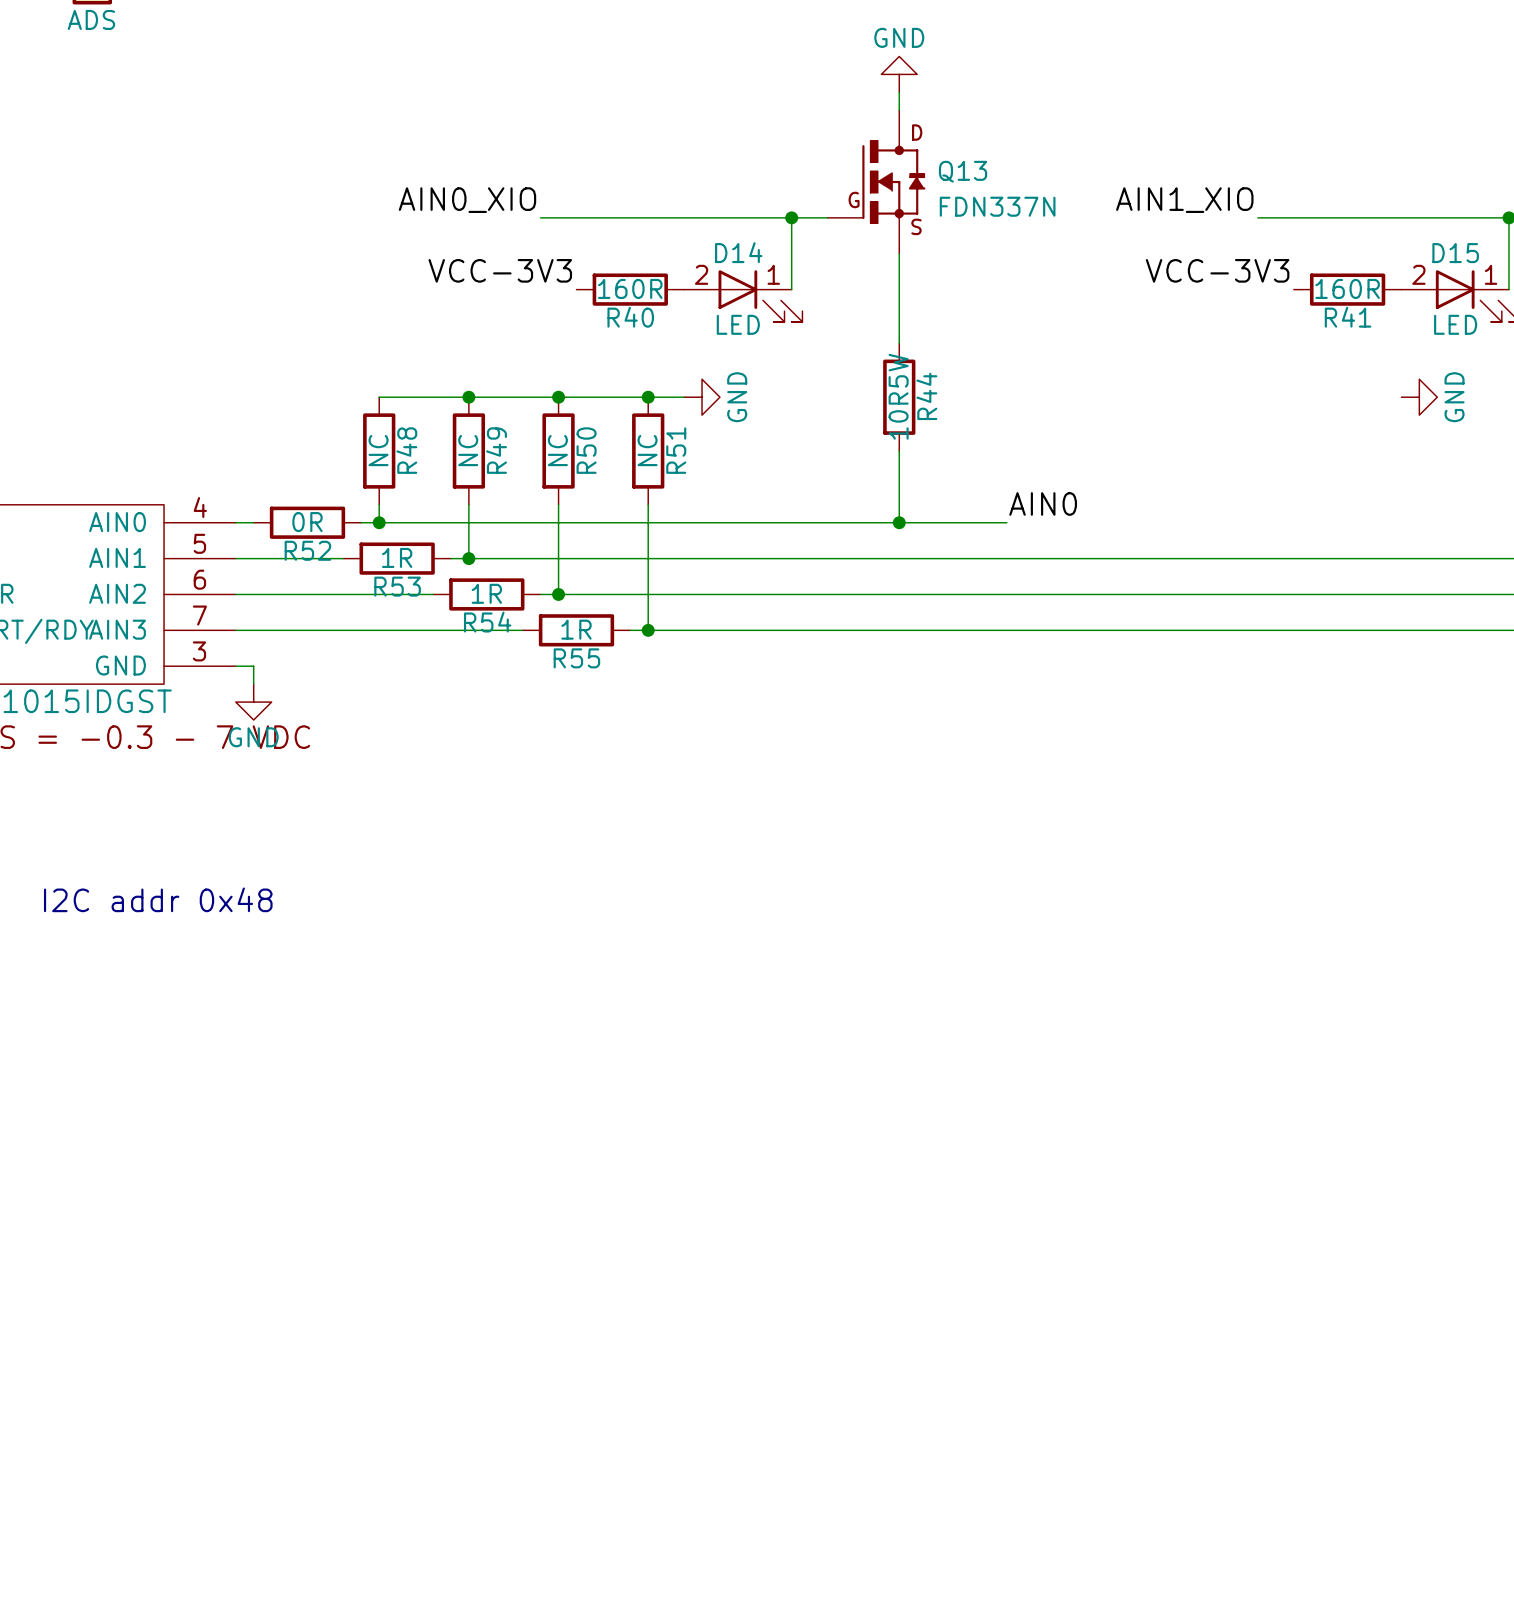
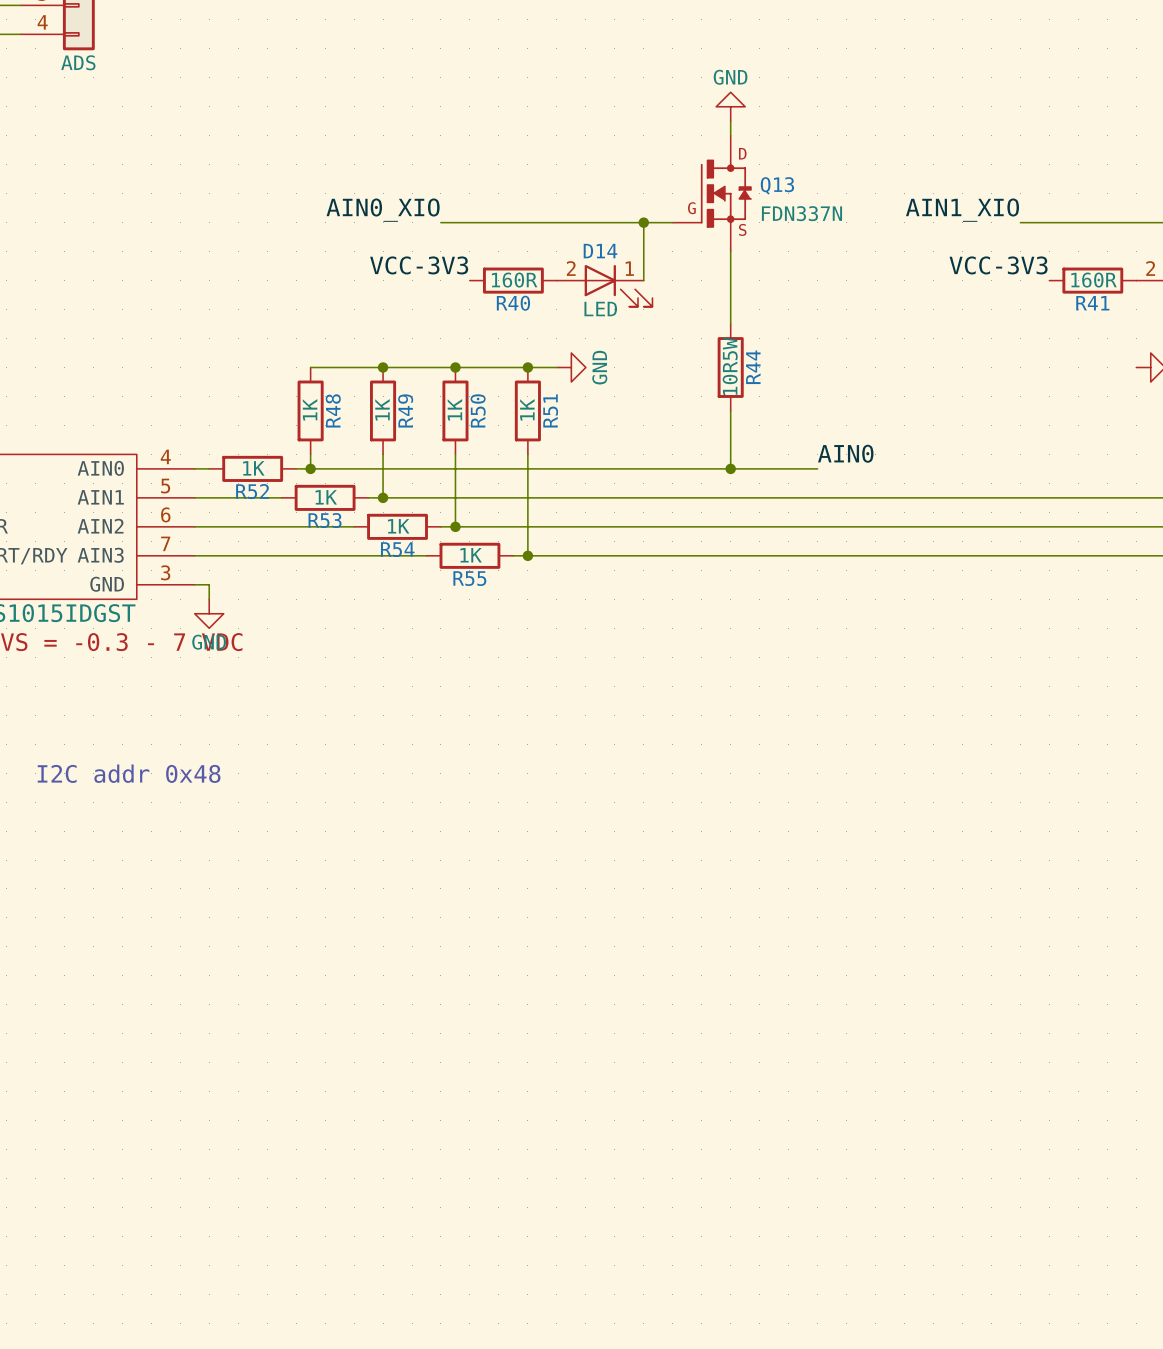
R48 value: NC (378, 450) -> 1K (310, 409)
R49 value: NC (468, 450) -> 1K (382, 409)
R50 value: NC (557, 450) -> 1K (454, 409)
R51 value: NC (647, 450) -> 1K (527, 409)
R52 value: 0R (307, 522) -> 1K (253, 468)
R53 value: 1R (397, 557) -> 1K (326, 497)
R54 value: 1R (486, 593) -> 1K (398, 526)
R55 value: 1R (576, 629) -> 1K (471, 555)

